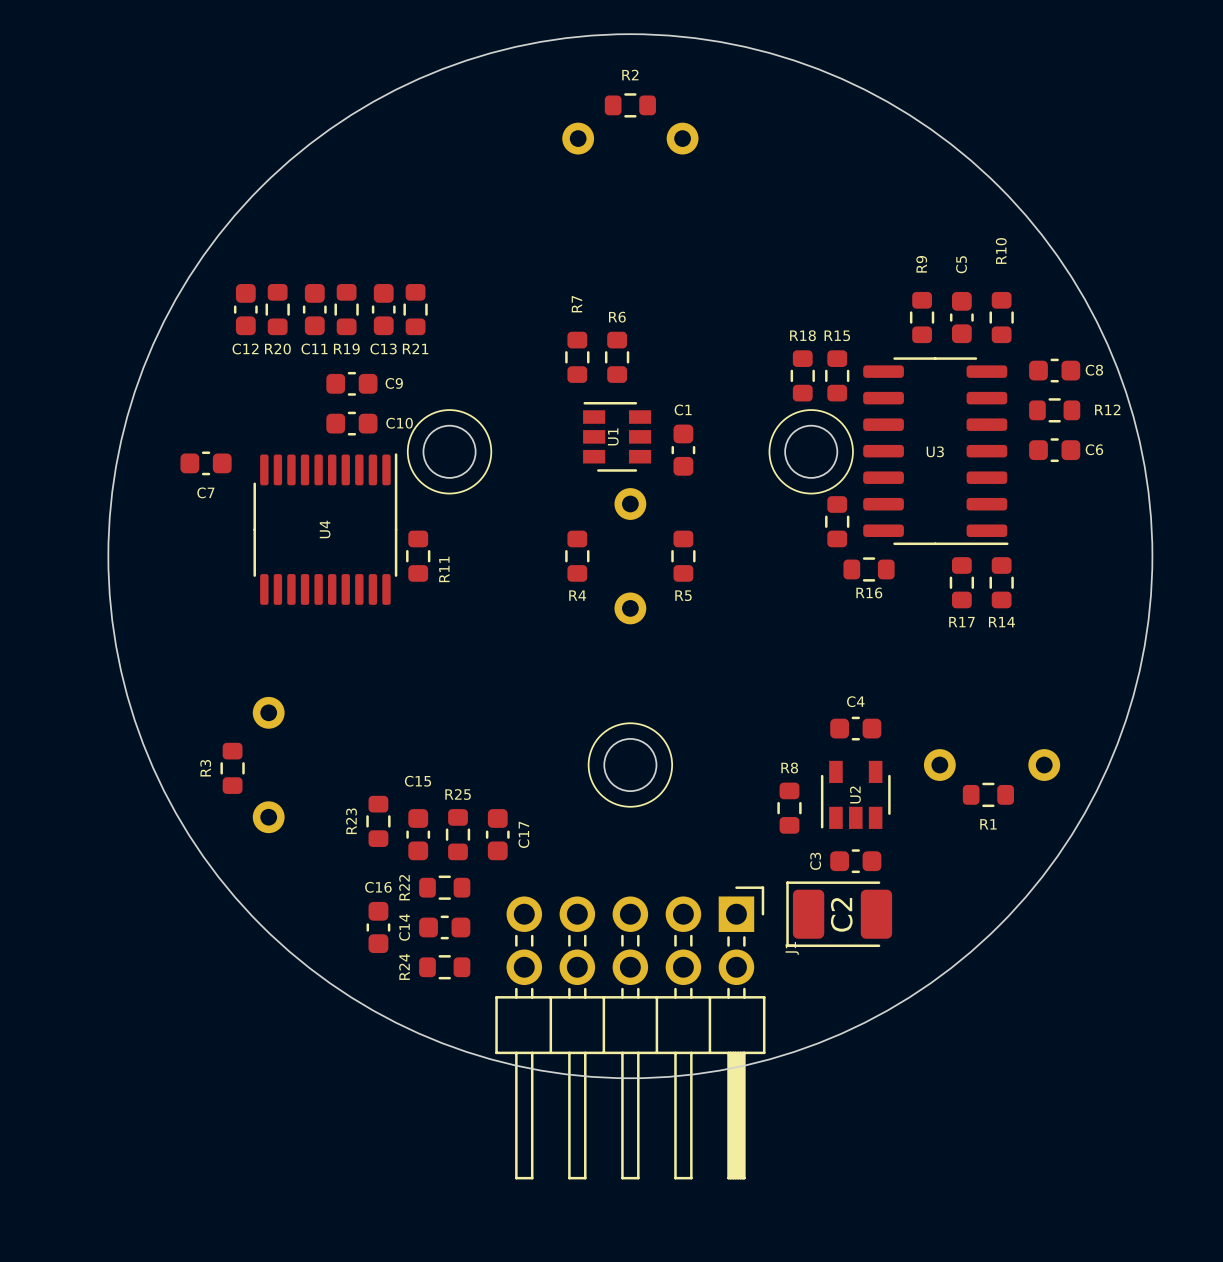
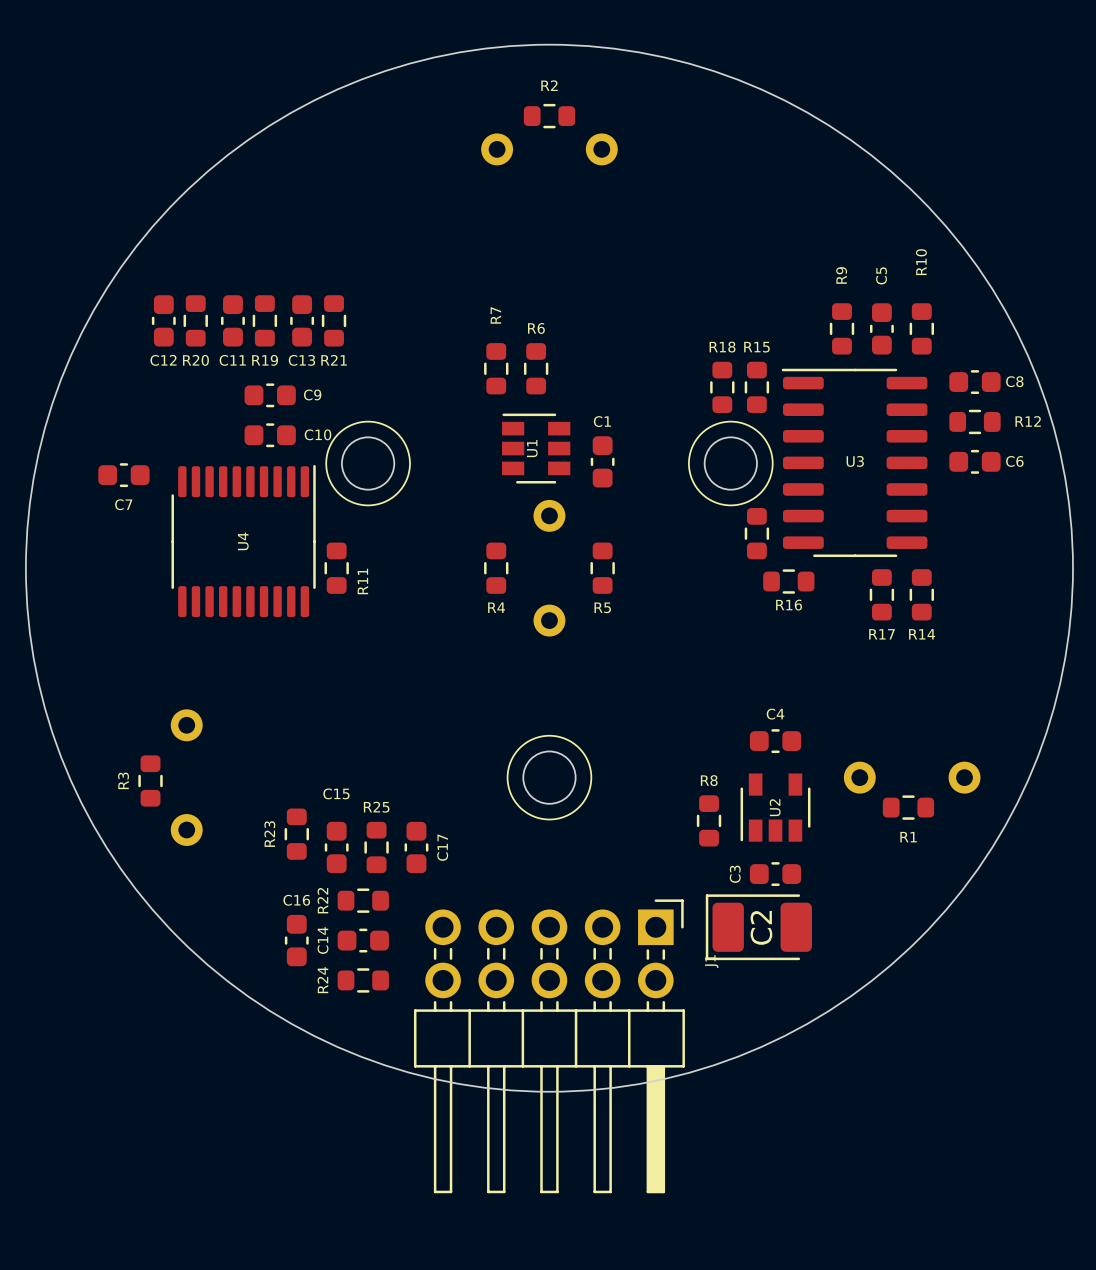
U3 rotation: 0° (935, 451) -> 180° (854, 462)

